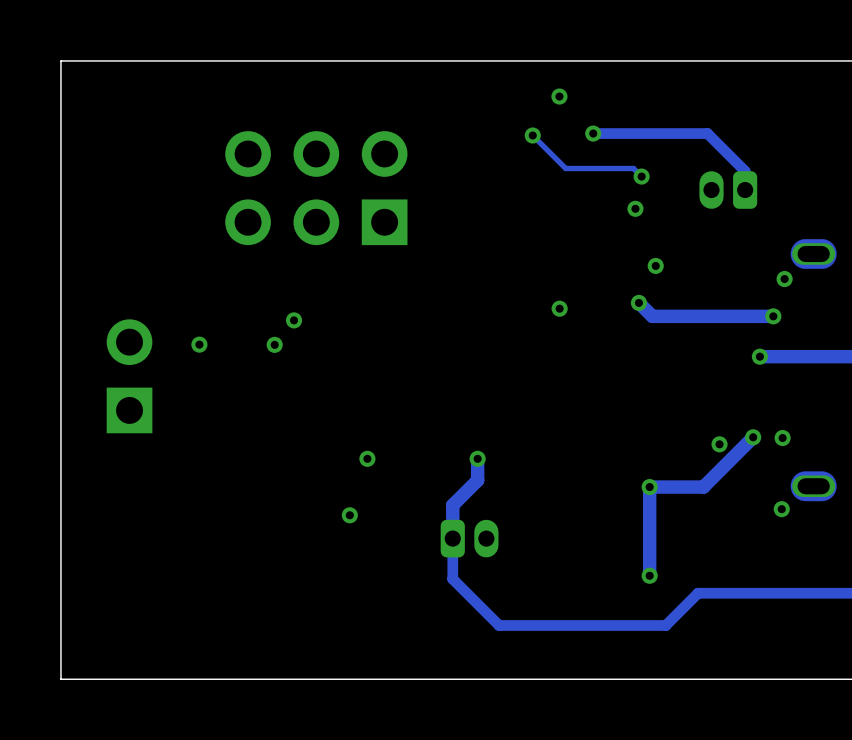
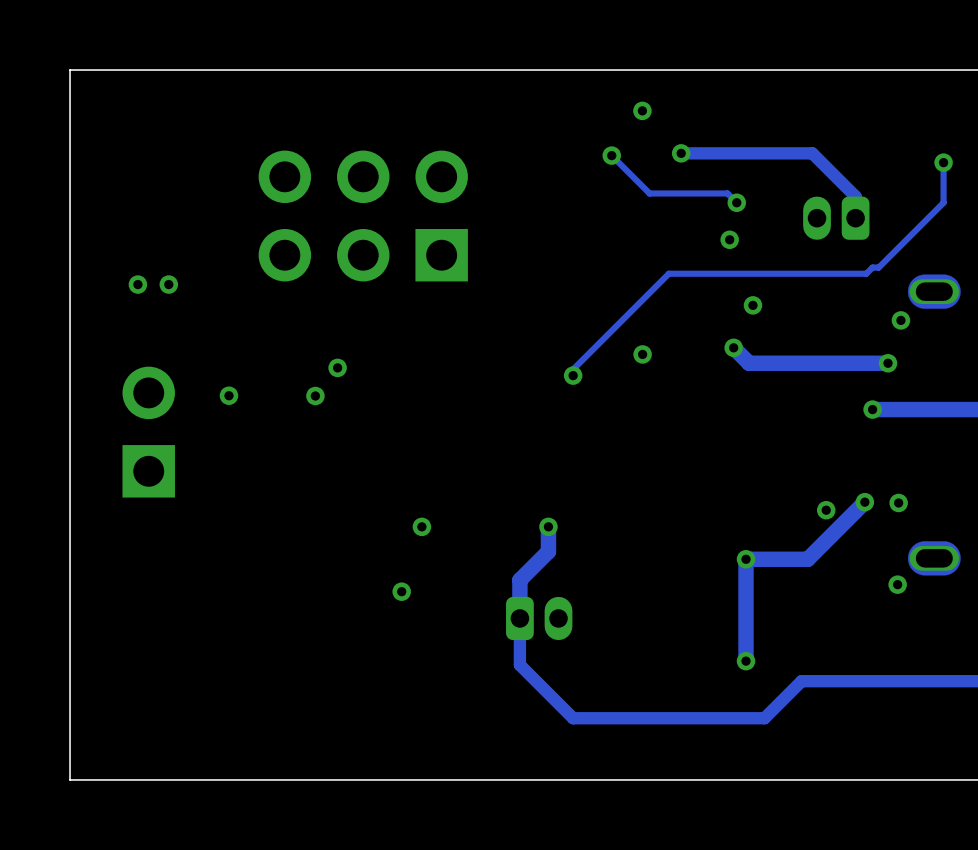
track: none -> (943, 162) (943, 202) (878, 267) (872, 267) (866, 273) (668, 273) (573, 369) (573, 375)
via: none -> (943, 162)
via: none -> (137, 284)
via: none -> (168, 284)
via: none -> (573, 375)

